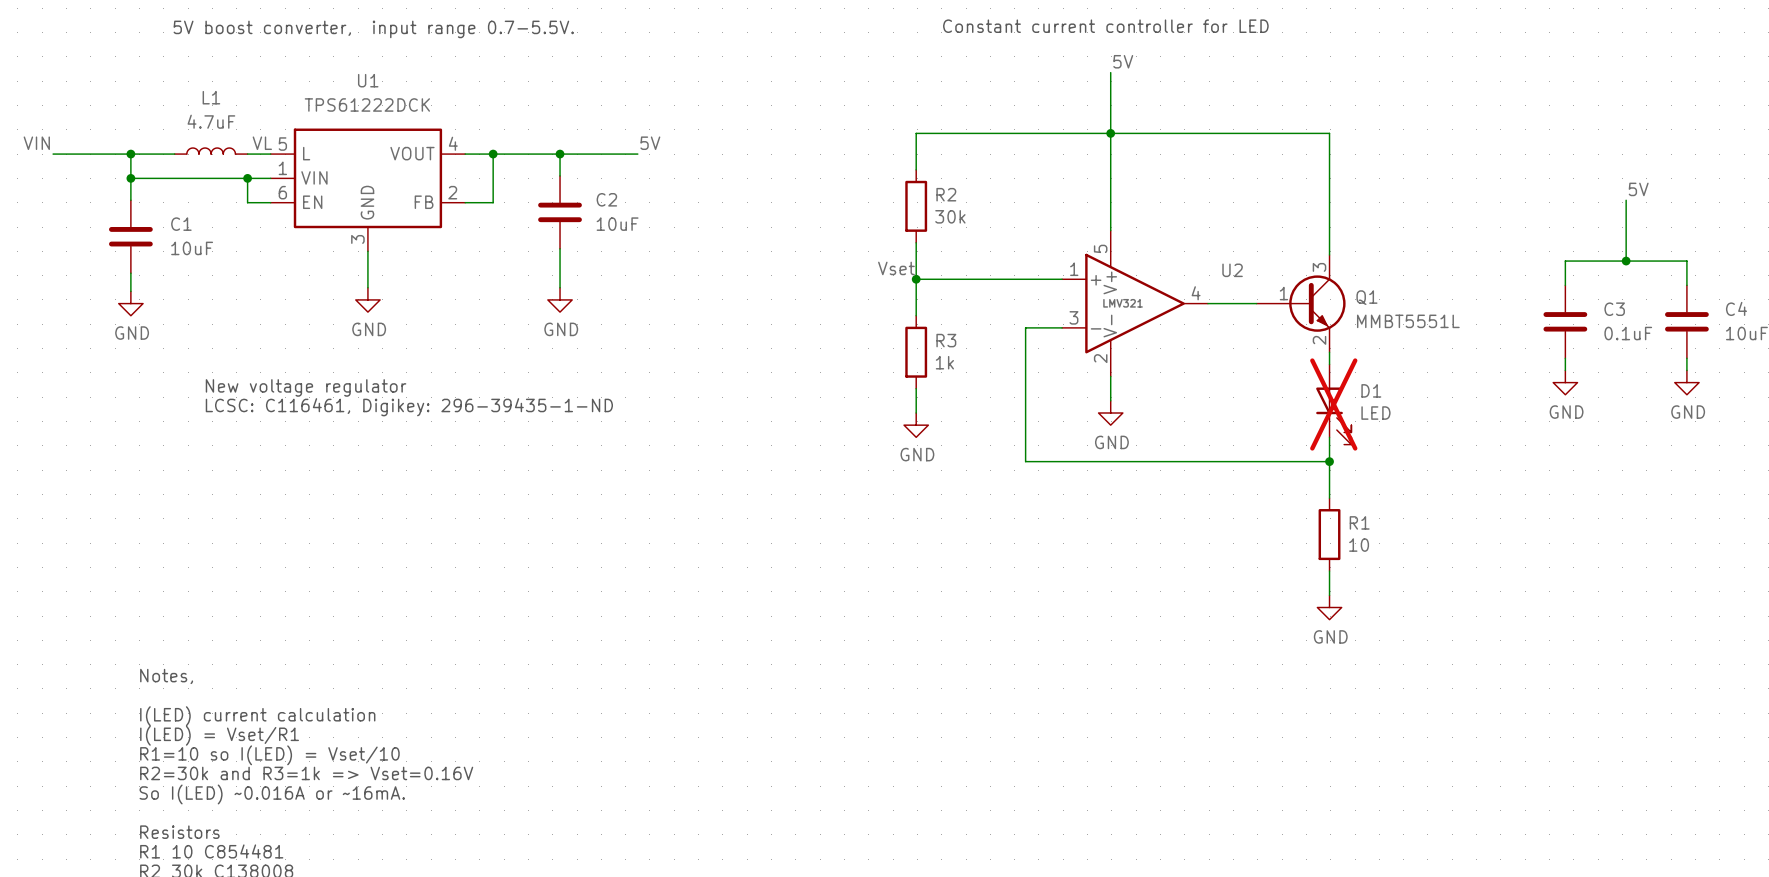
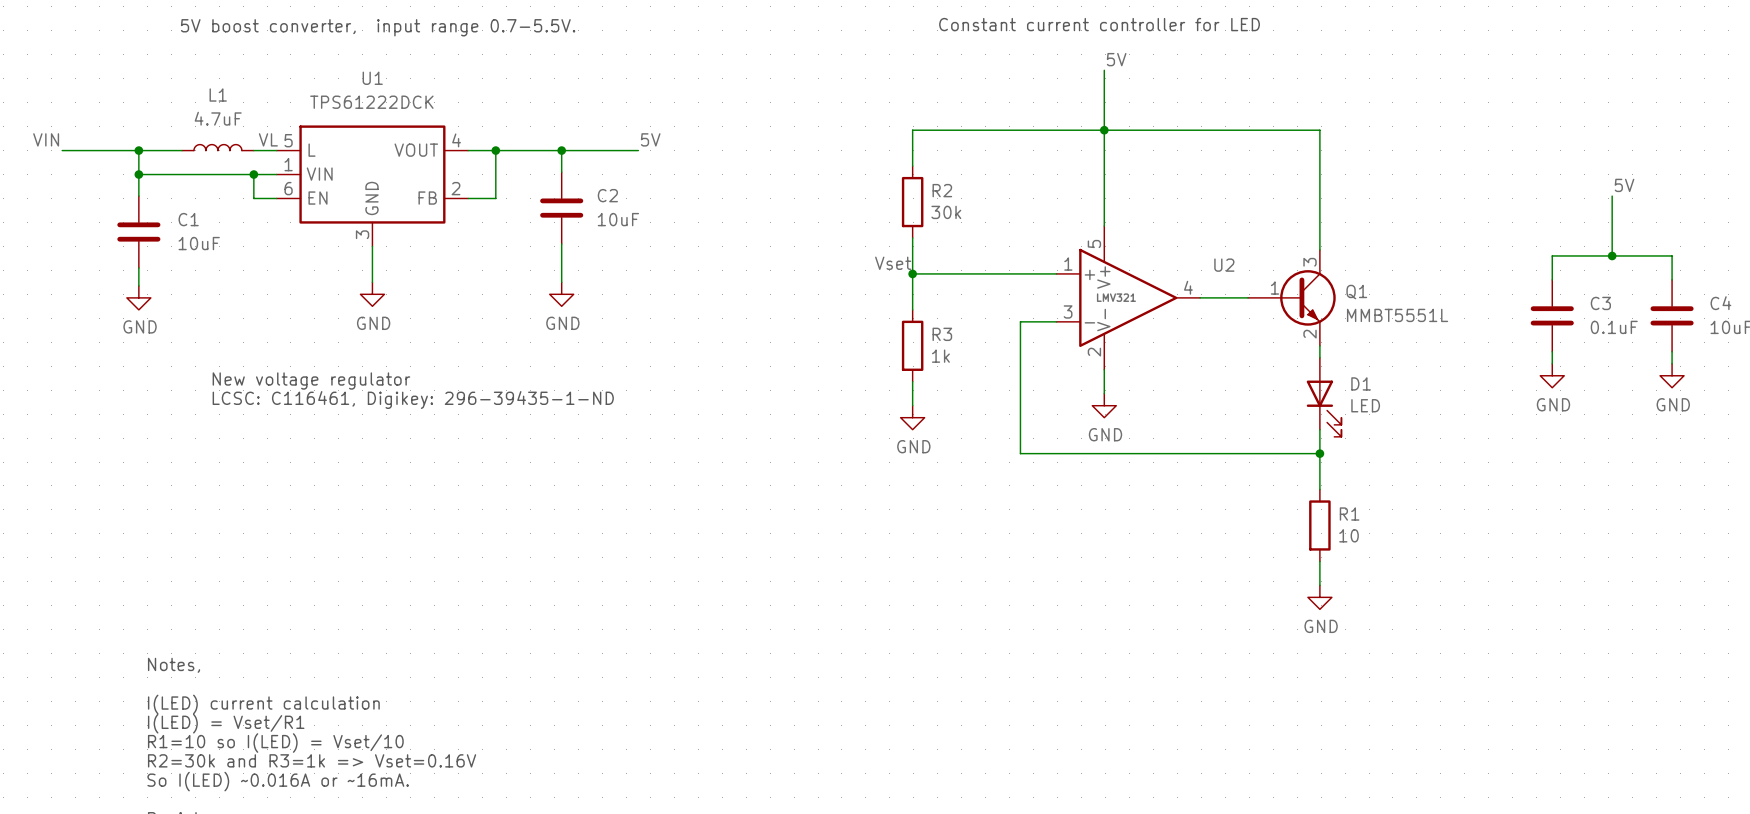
D1 do-not-place cross: (1333, 404) -> none

